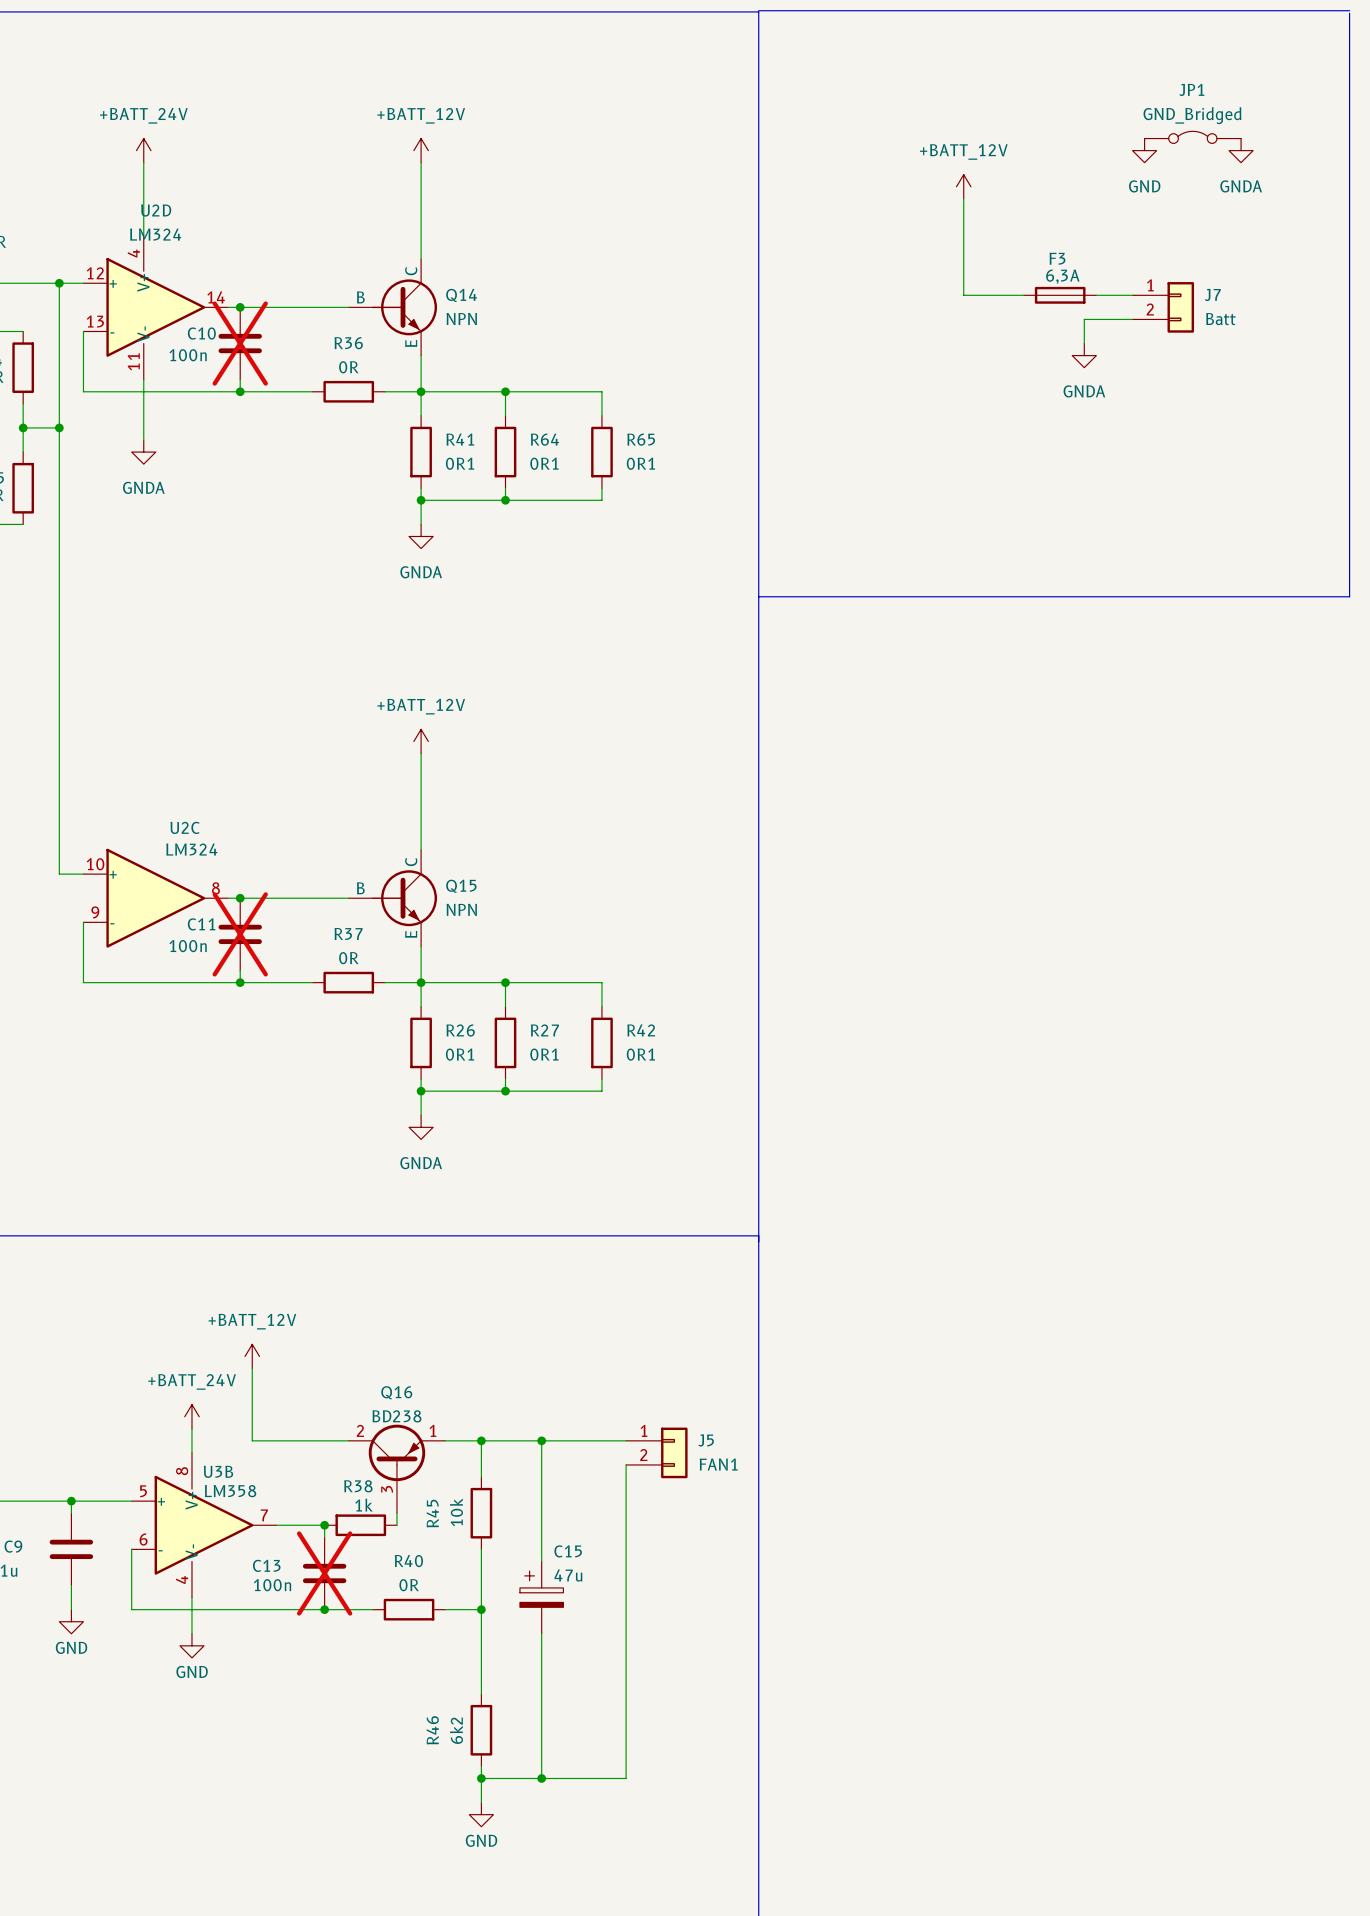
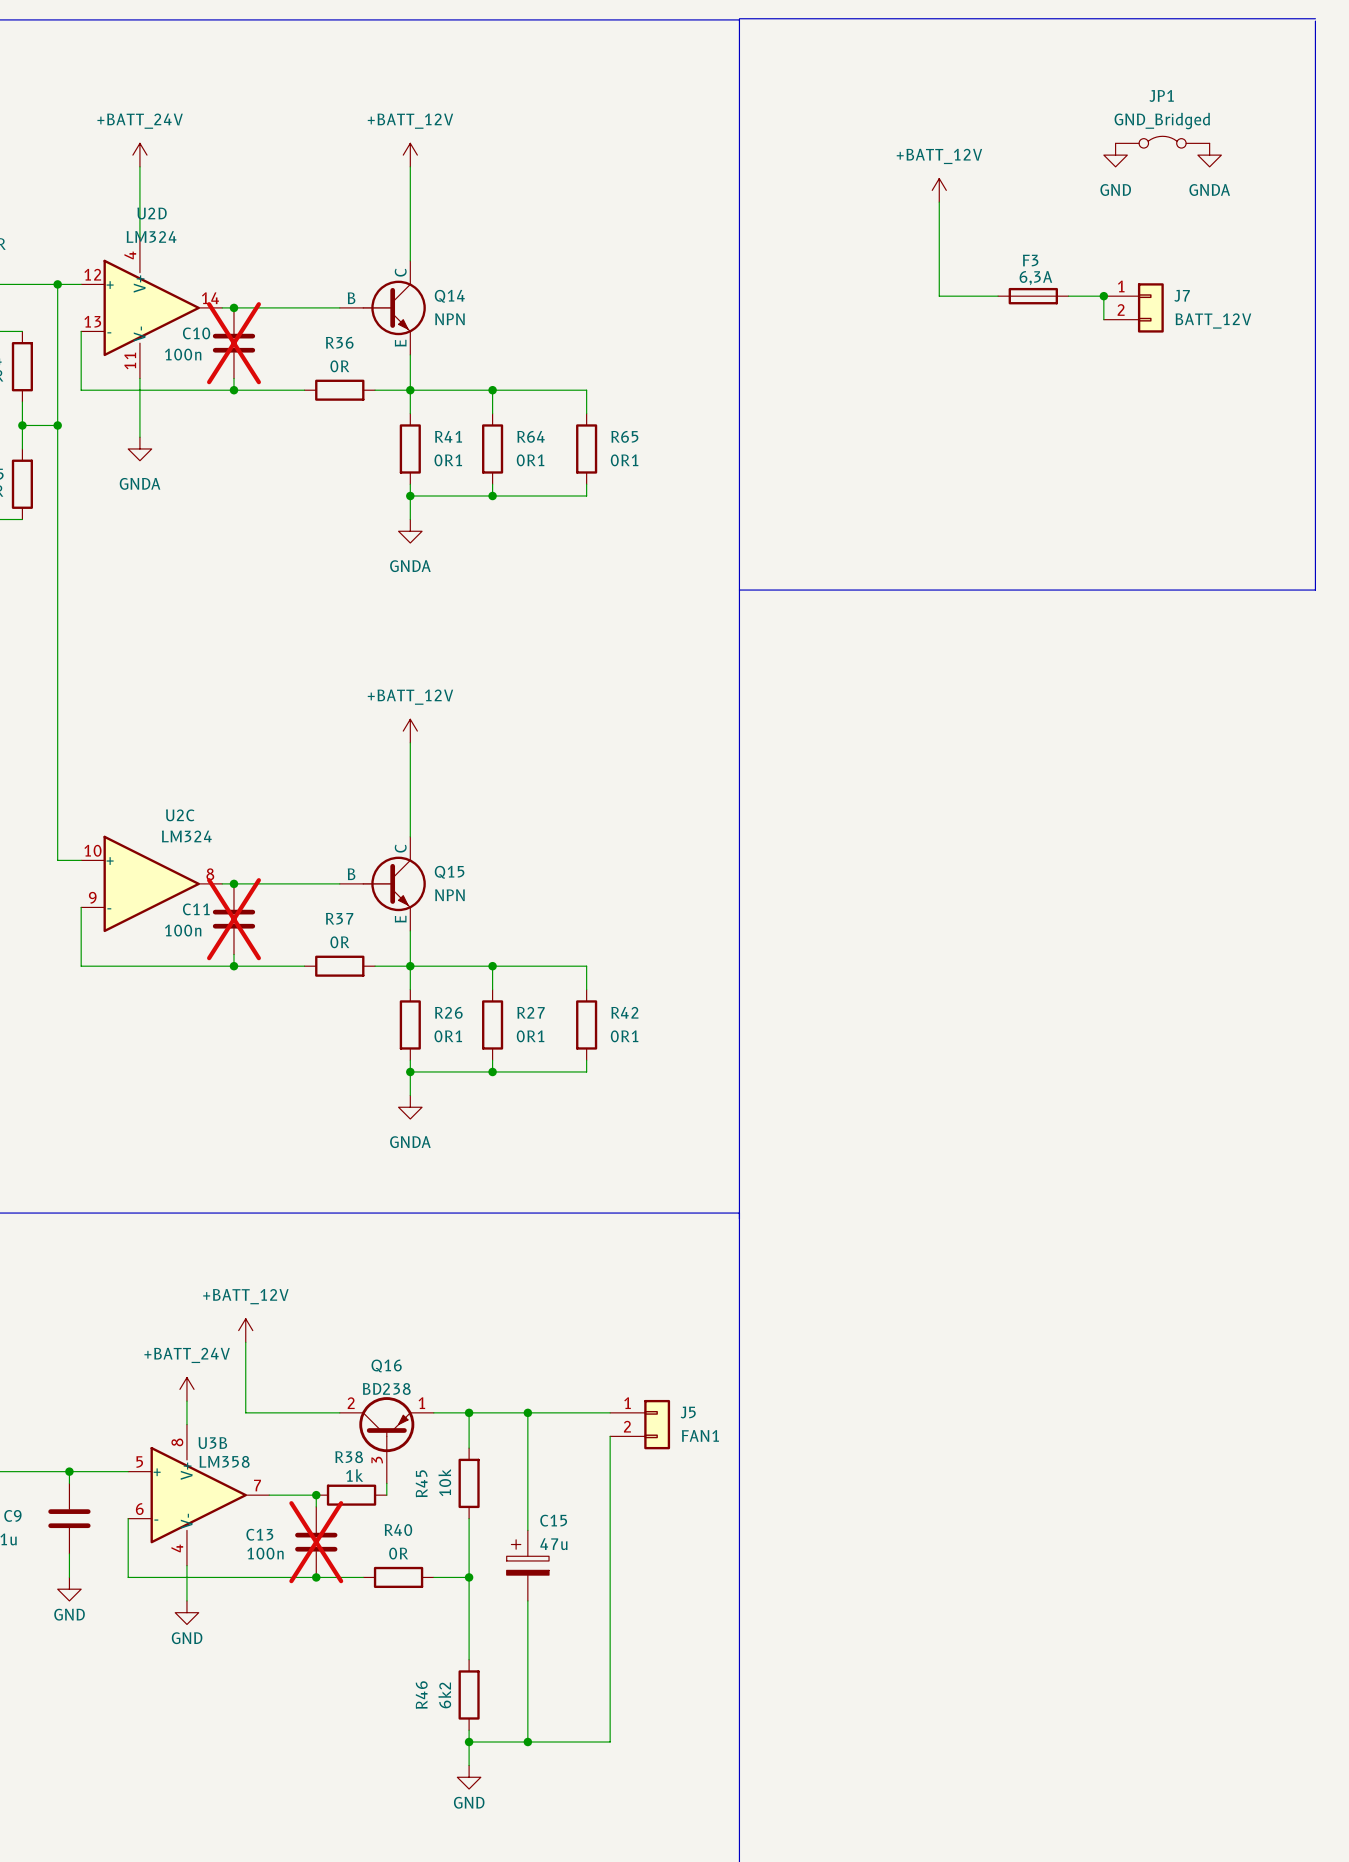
junction: none -> (1103, 296)
wire: (1132, 319) (1084, 319) (1084, 343) -> (1103, 319) (1103, 296)
J7 value: Batt (1220, 319) -> BATT_12V (1213, 321)
power symbol: GNDA (1084, 355) -> none

